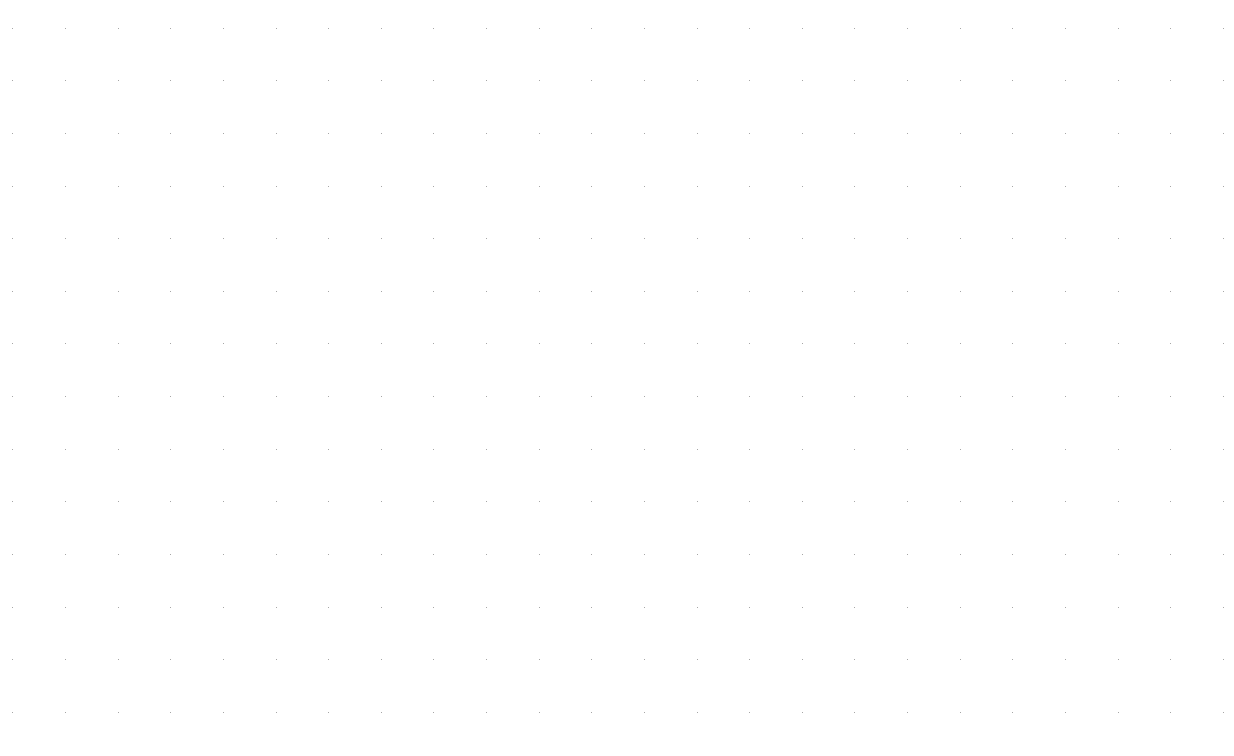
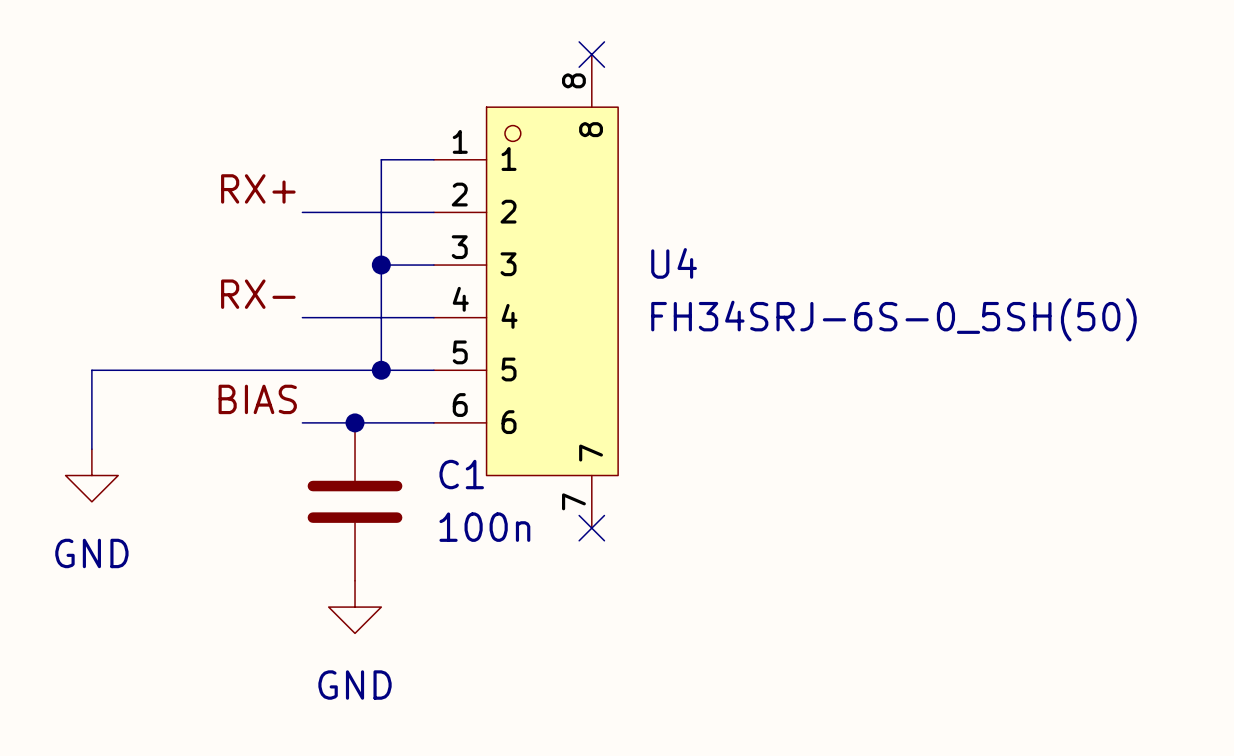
no-connect mark: none -> (591, 54)
wire: none -> (433, 159) (381, 159) (381, 370)
label: none -> RX+ (258, 188)
wire: none -> (302, 212) (433, 212)
wire: none -> (381, 265) (433, 265)
junction: none -> (381, 265)
U4: none -> FH34SRJ-6S-0_5SH(50) (526, 291)
label: none -> RX- (258, 294)
wire: none -> (302, 317) (433, 317)
junction: none -> (381, 370)
wire: none -> (433, 370) (91, 370) (91, 449)
label: none -> BIAS (257, 399)
wire: none -> (302, 422) (433, 422)
junction: none -> (355, 422)
power symbol: none -> GND (91, 475)
C1: none -> 100n (355, 501)
no-connect mark: none -> (591, 528)
power symbol: none -> GND (355, 607)

